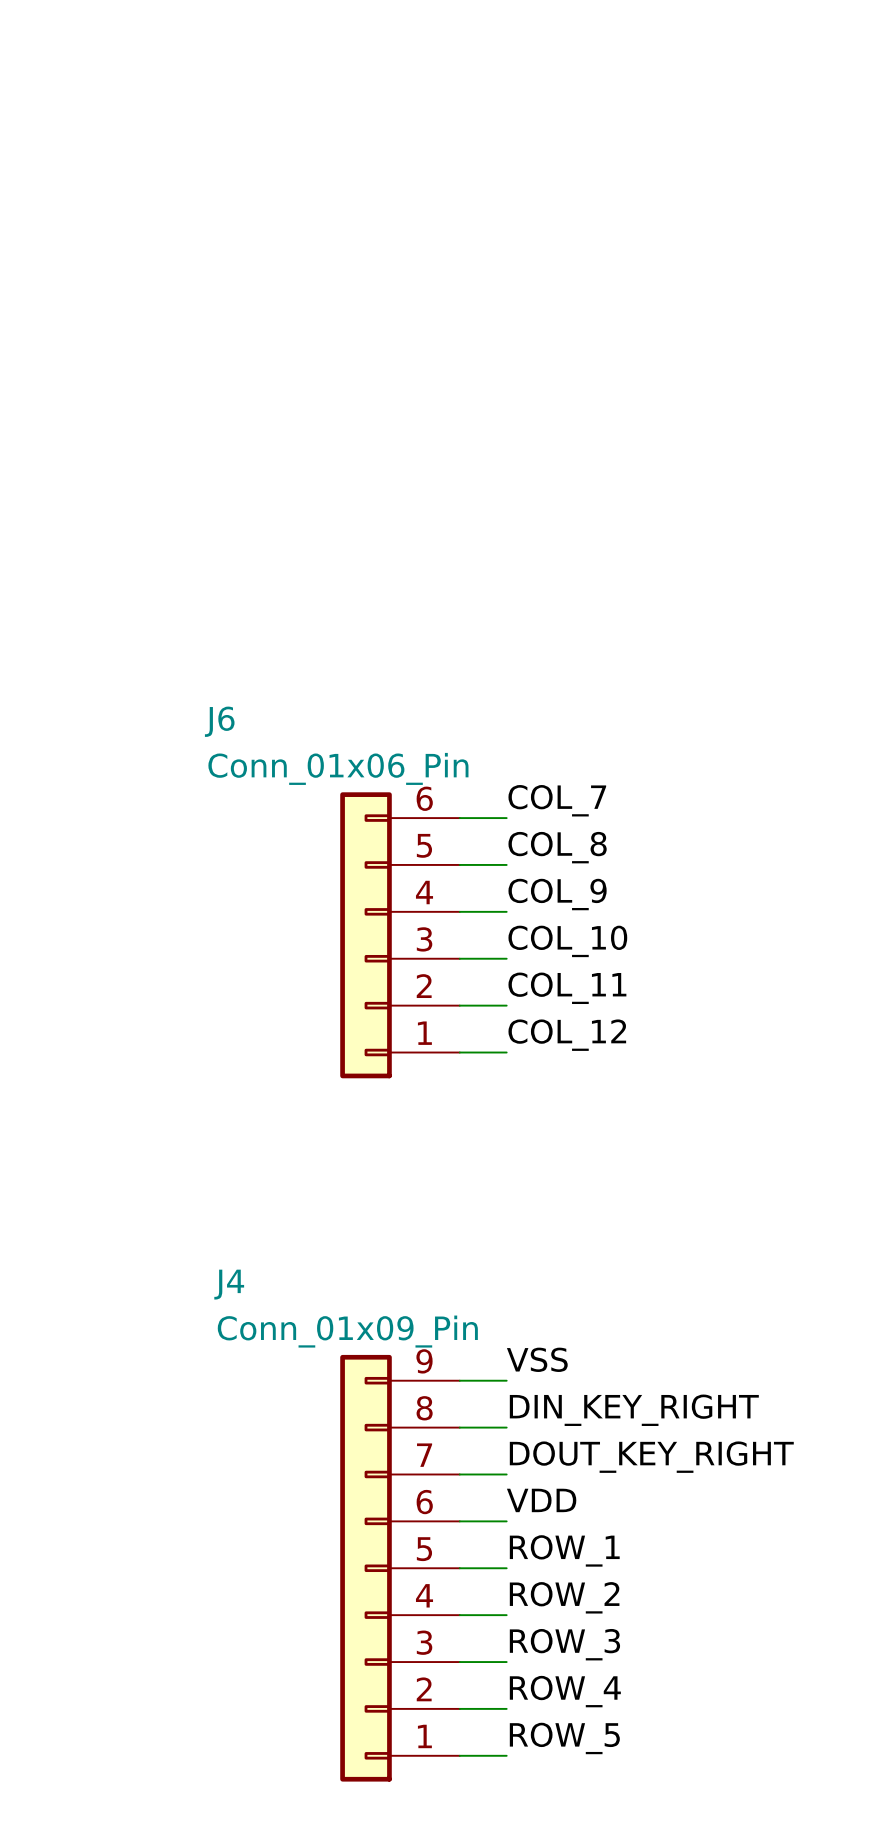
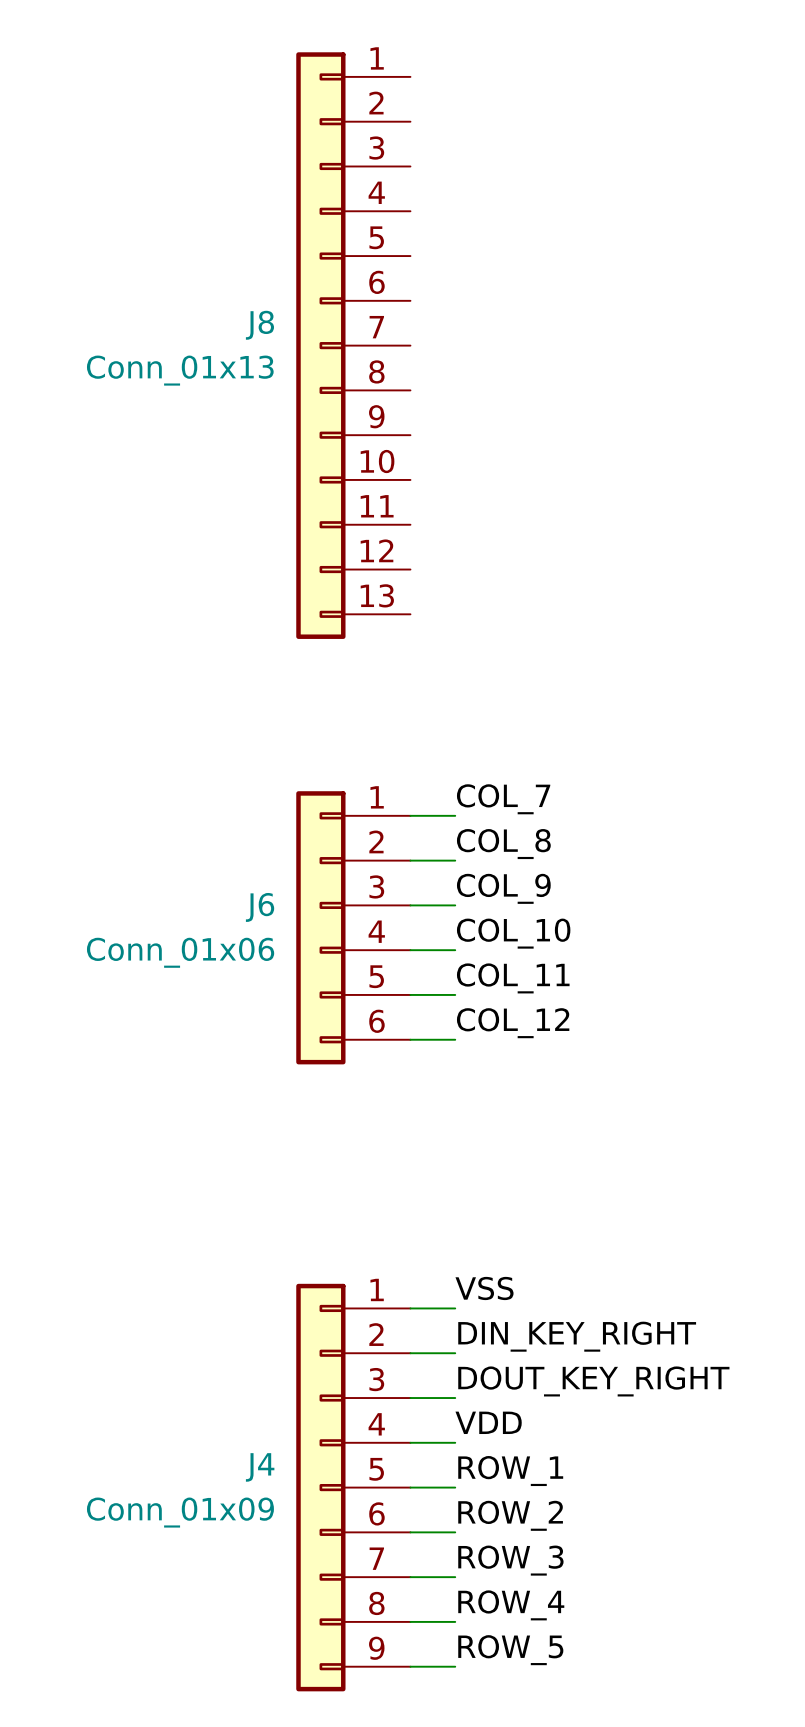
J8: none -> Conn_01x13 (353, 345)
J6 name position: J6 (219, 721) -> J6 (260, 907)
J6 value: Conn_01x06_Pin (338, 768) -> Conn_01x06 (180, 952)
label: COL_7 (557, 800) -> none
wire: (459, 818) (506, 818) -> (410, 1039) (455, 1039)
label: COL_8 (557, 847) -> COL_7 (503, 799)
label: COL_9 (557, 894) -> COL_8 (503, 844)
J6 flip: as is (366, 935) -> up-down (320, 927)
label: COL_10 (567, 941) -> COL_9 (503, 888)
label: COL_11 (567, 988) -> COL_10 (513, 933)
label: COL_12 (567, 1035) -> COL_11 (513, 978)
label: none -> COL_12 (513, 1023)
J4 name position: J4 (229, 1284) -> J4 (260, 1467)
J4 value: Conn_01x09_Pin (347, 1331) -> Conn_01x09 (180, 1512)
J4 flip: as is (366, 1568) -> up-down (320, 1487)

